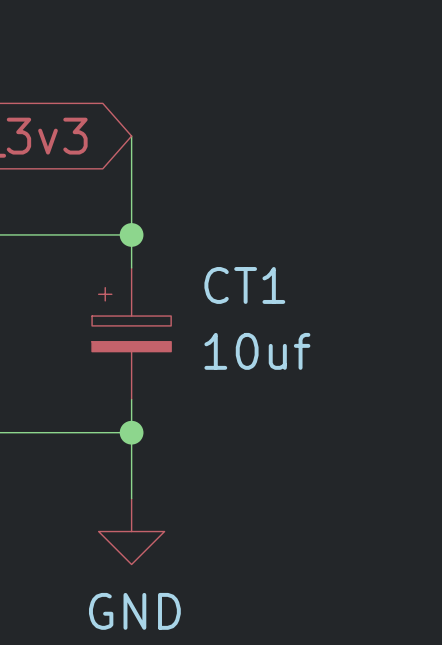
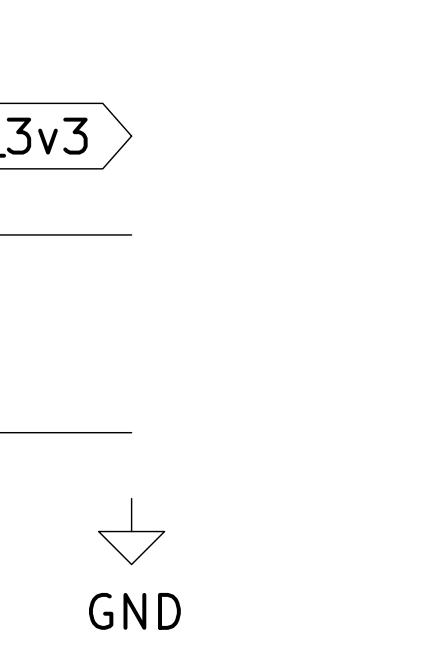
wire: (131, 136) (131, 267) -> none
junction: (131, 234) -> none
CT1: 10uf (131, 333) -> none
wire: (131, 399) (131, 498) -> none
junction: (131, 432) -> none

